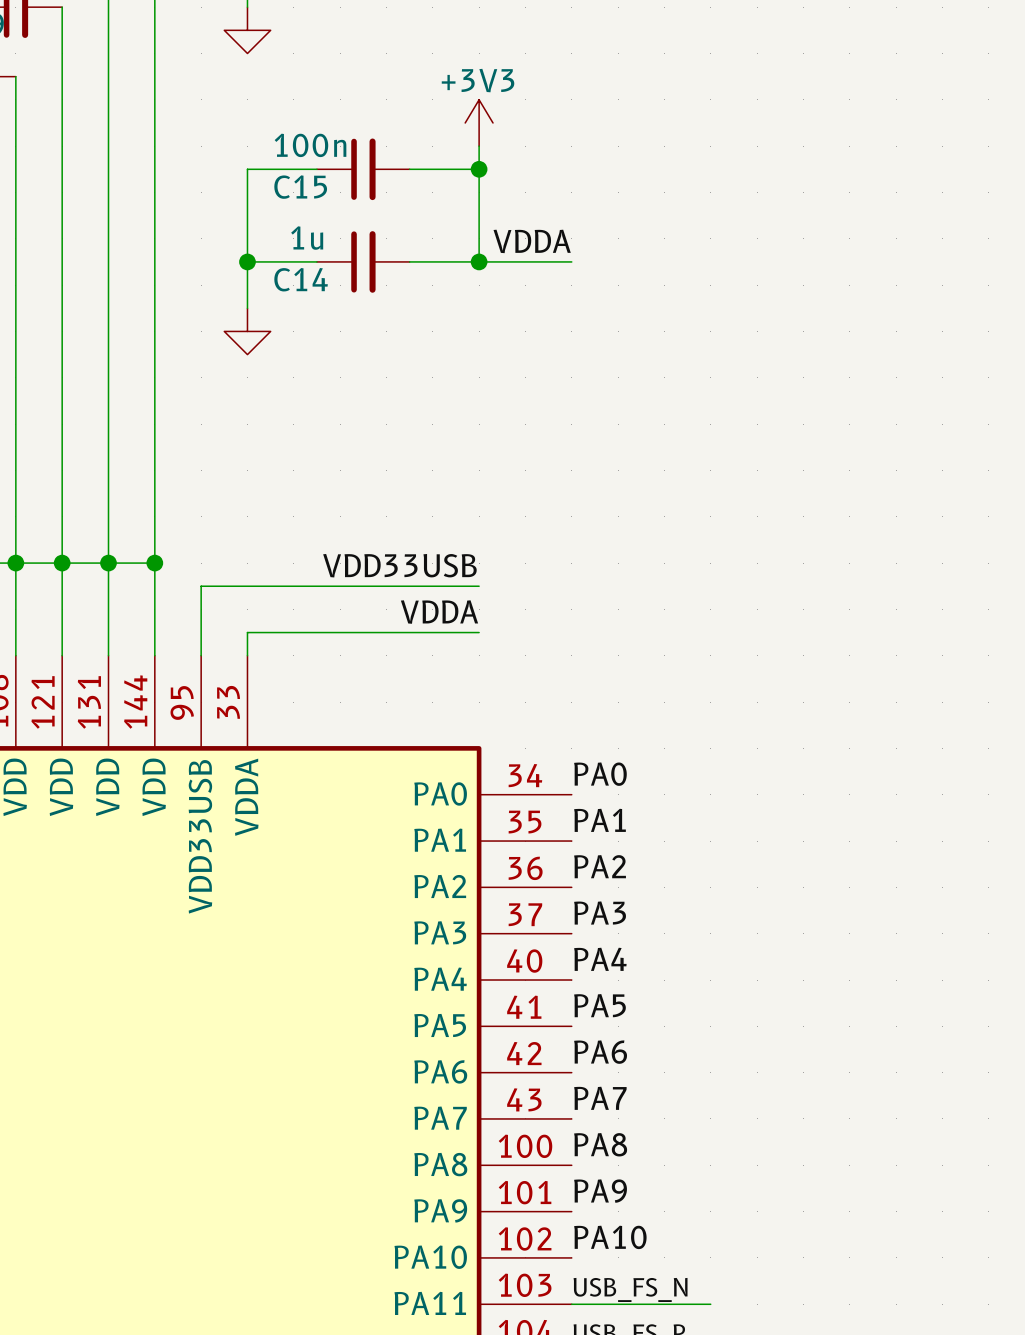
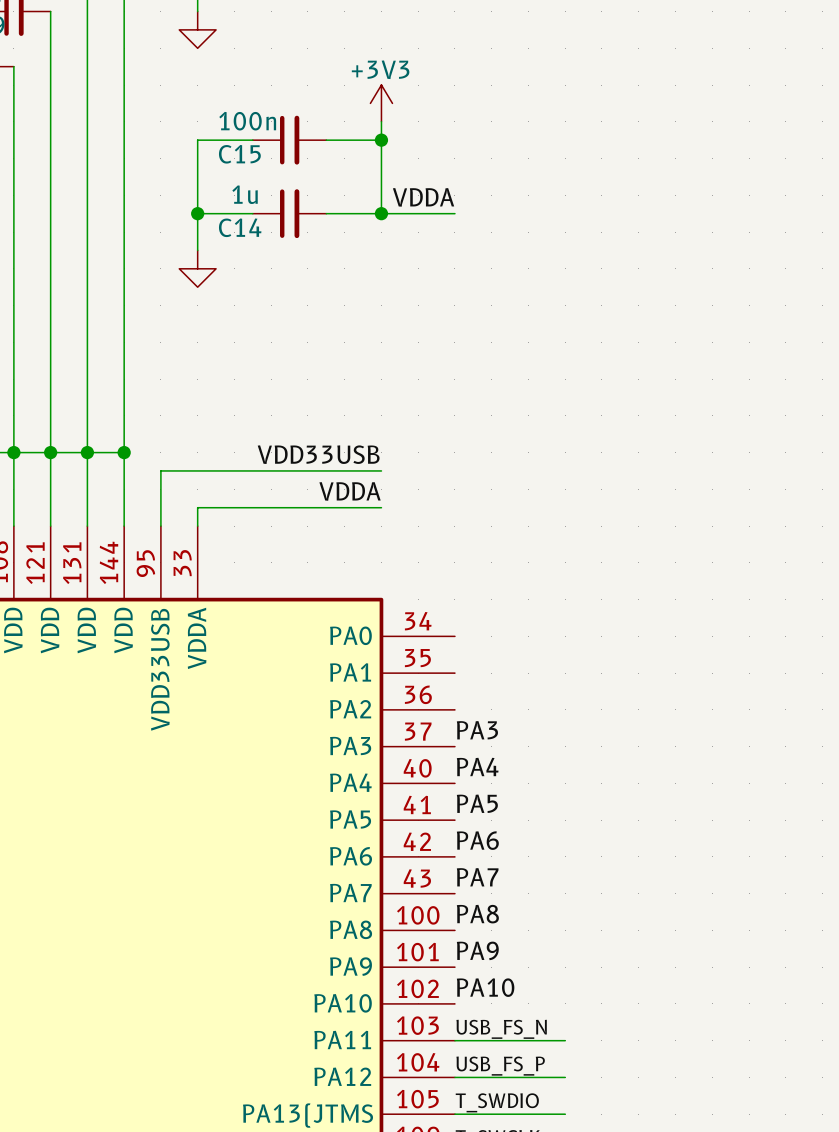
label: PA0 (600, 774) -> none
label: PA1 (599, 820) -> none
label: PA2 (600, 866) -> none

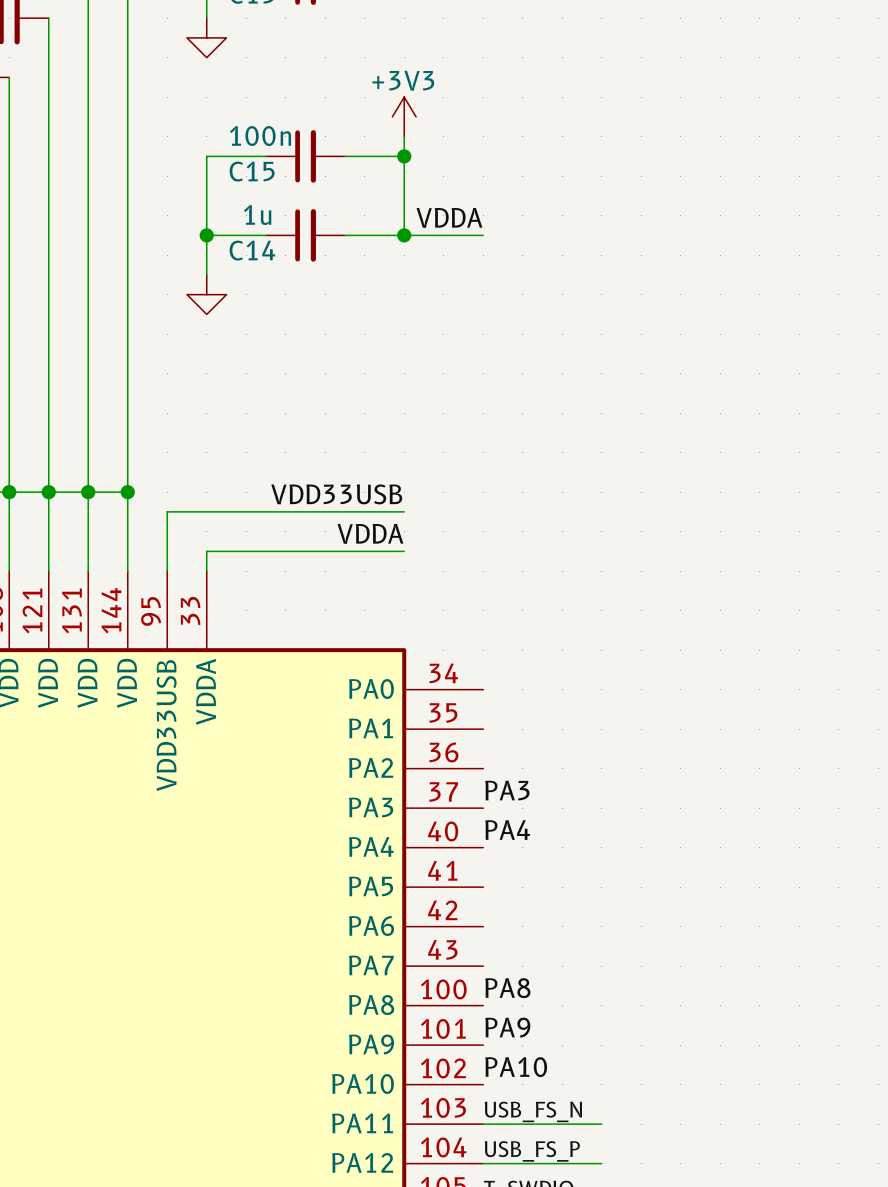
label: PA5 (477, 803) -> none
label: PA6 (477, 840) -> none
label: PA7 (477, 877) -> none

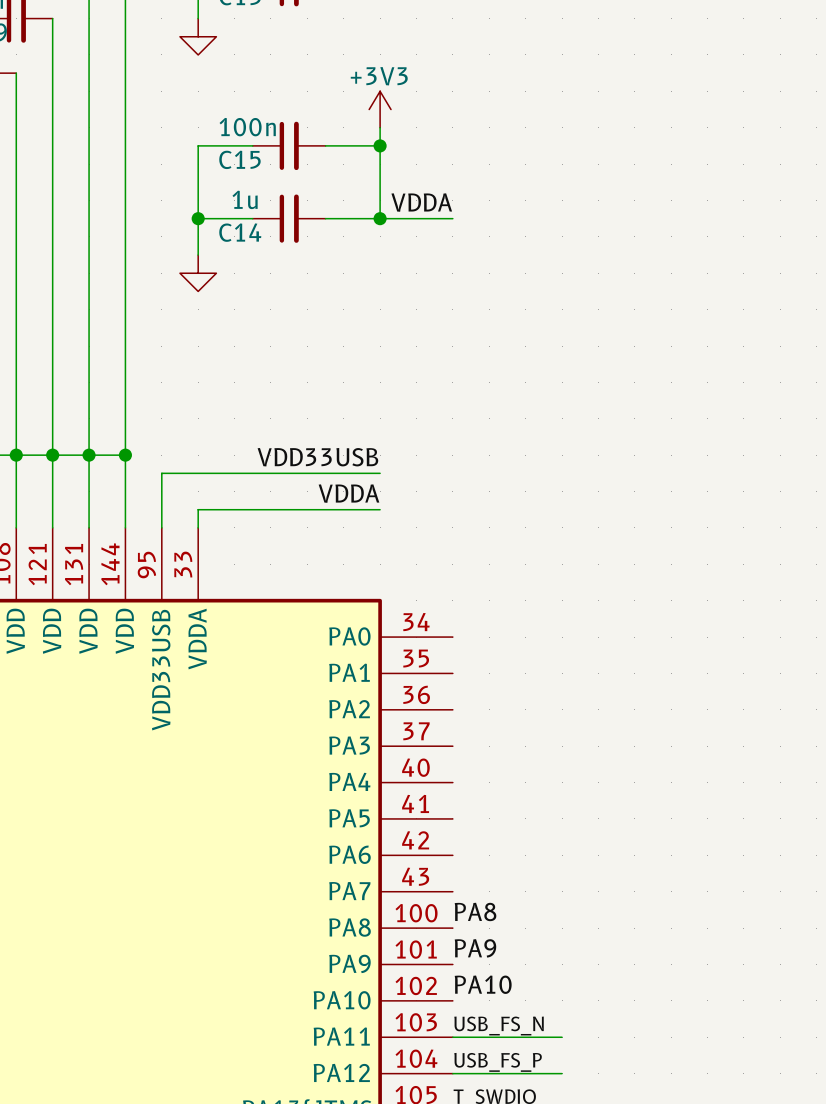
label: PA3 (507, 790) -> none
label: PA4 (507, 830) -> none

